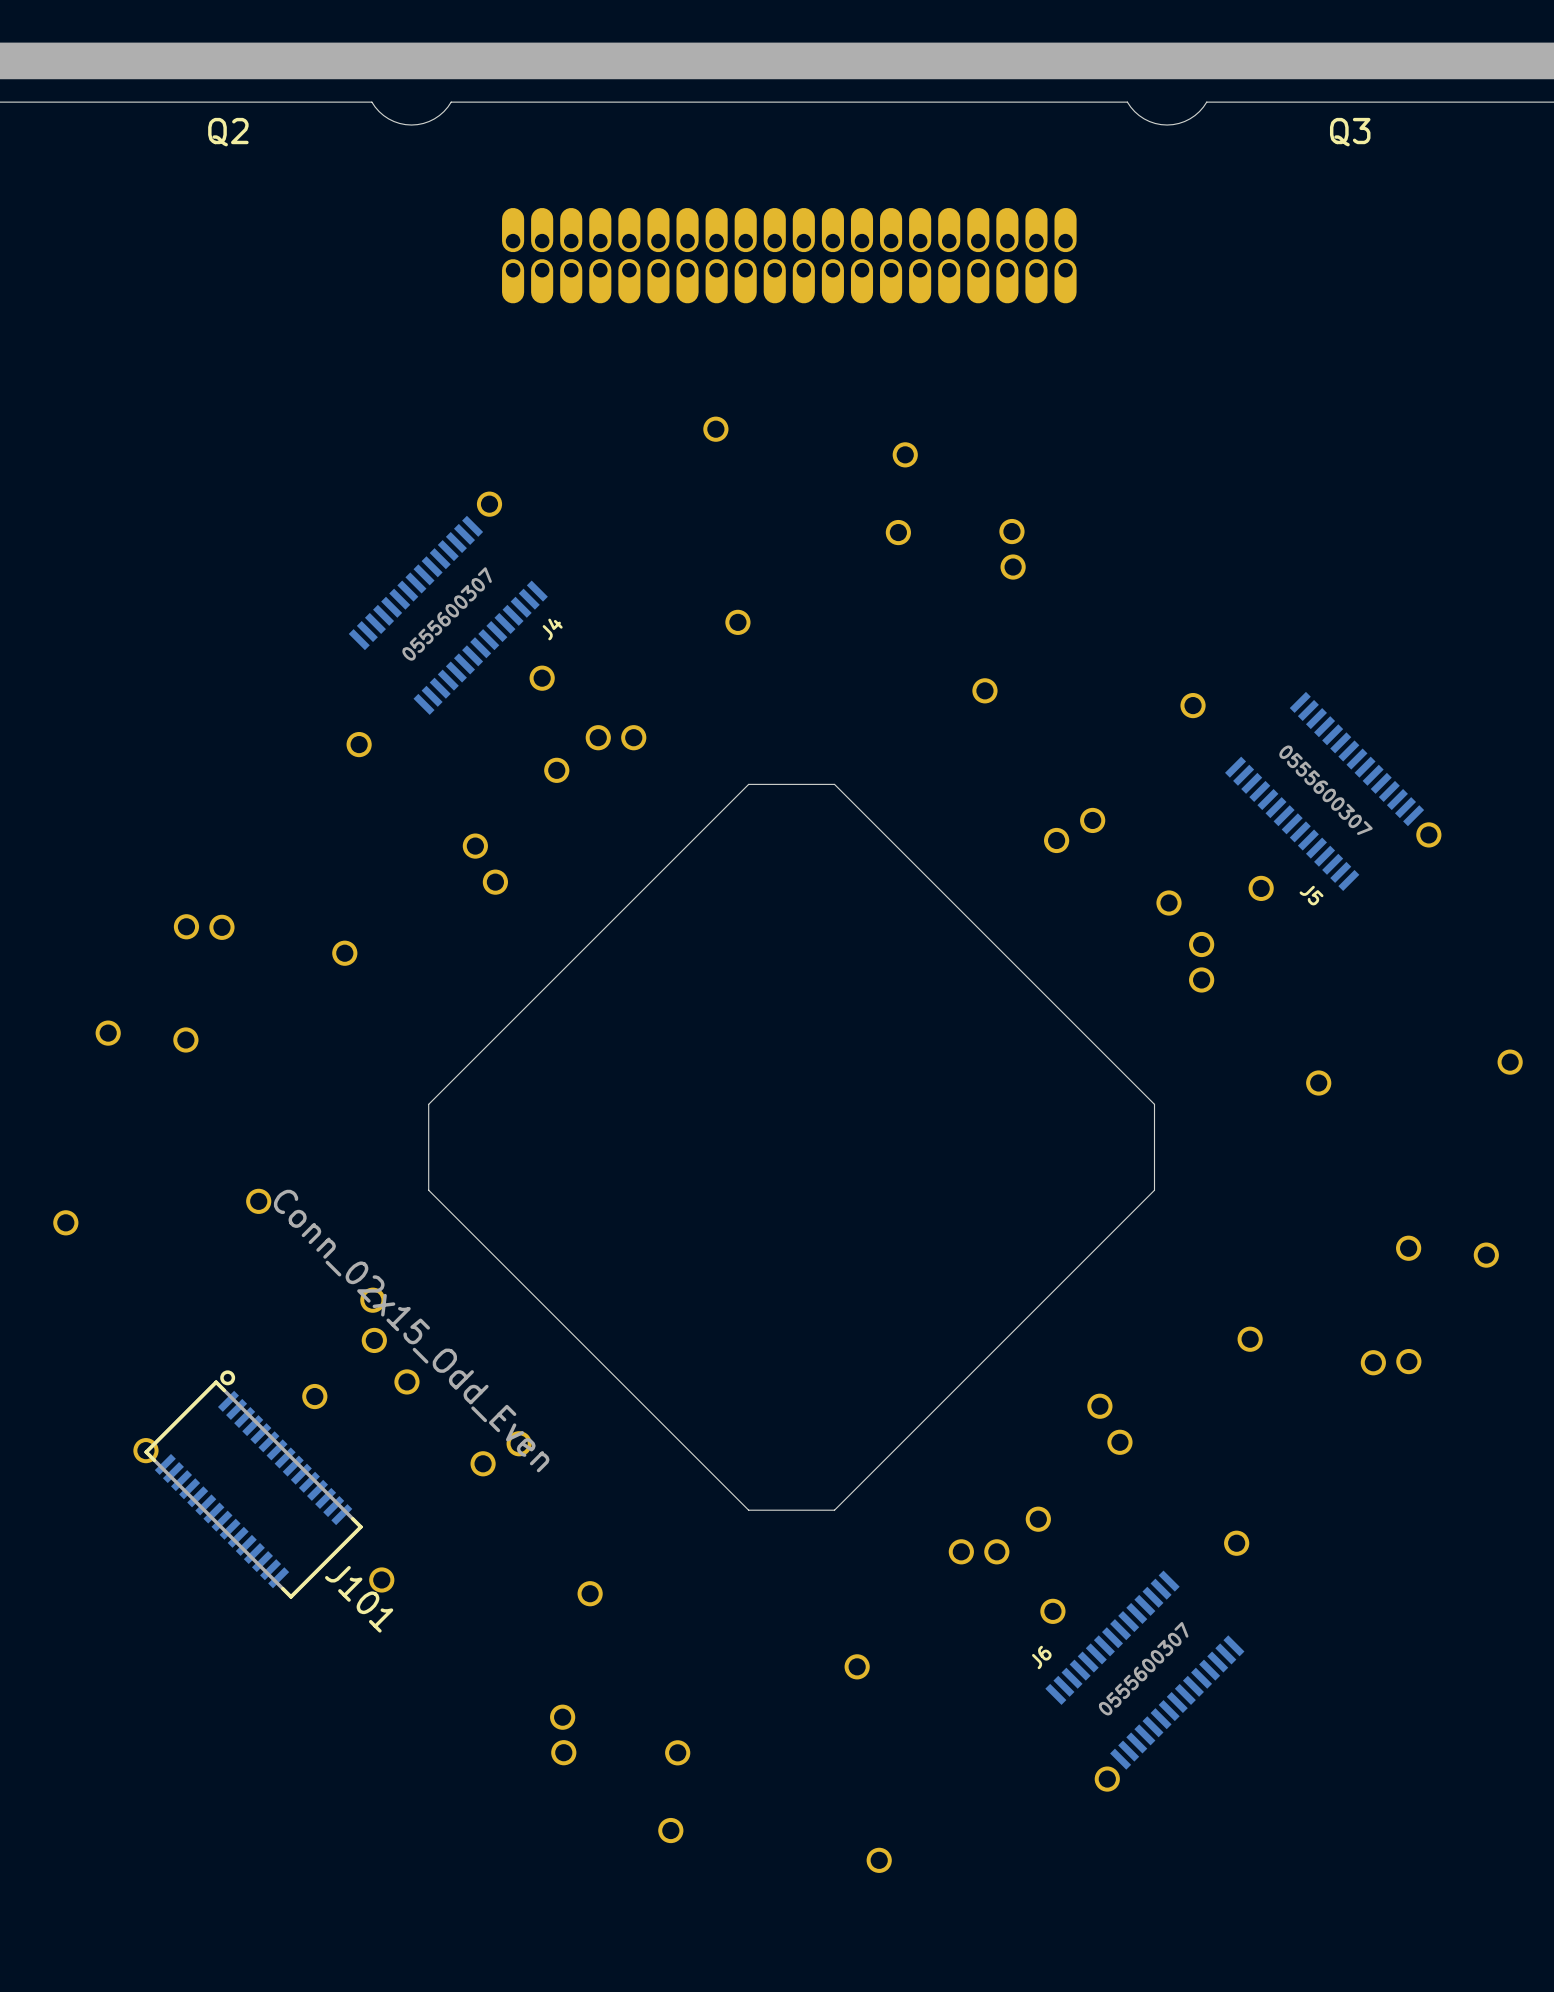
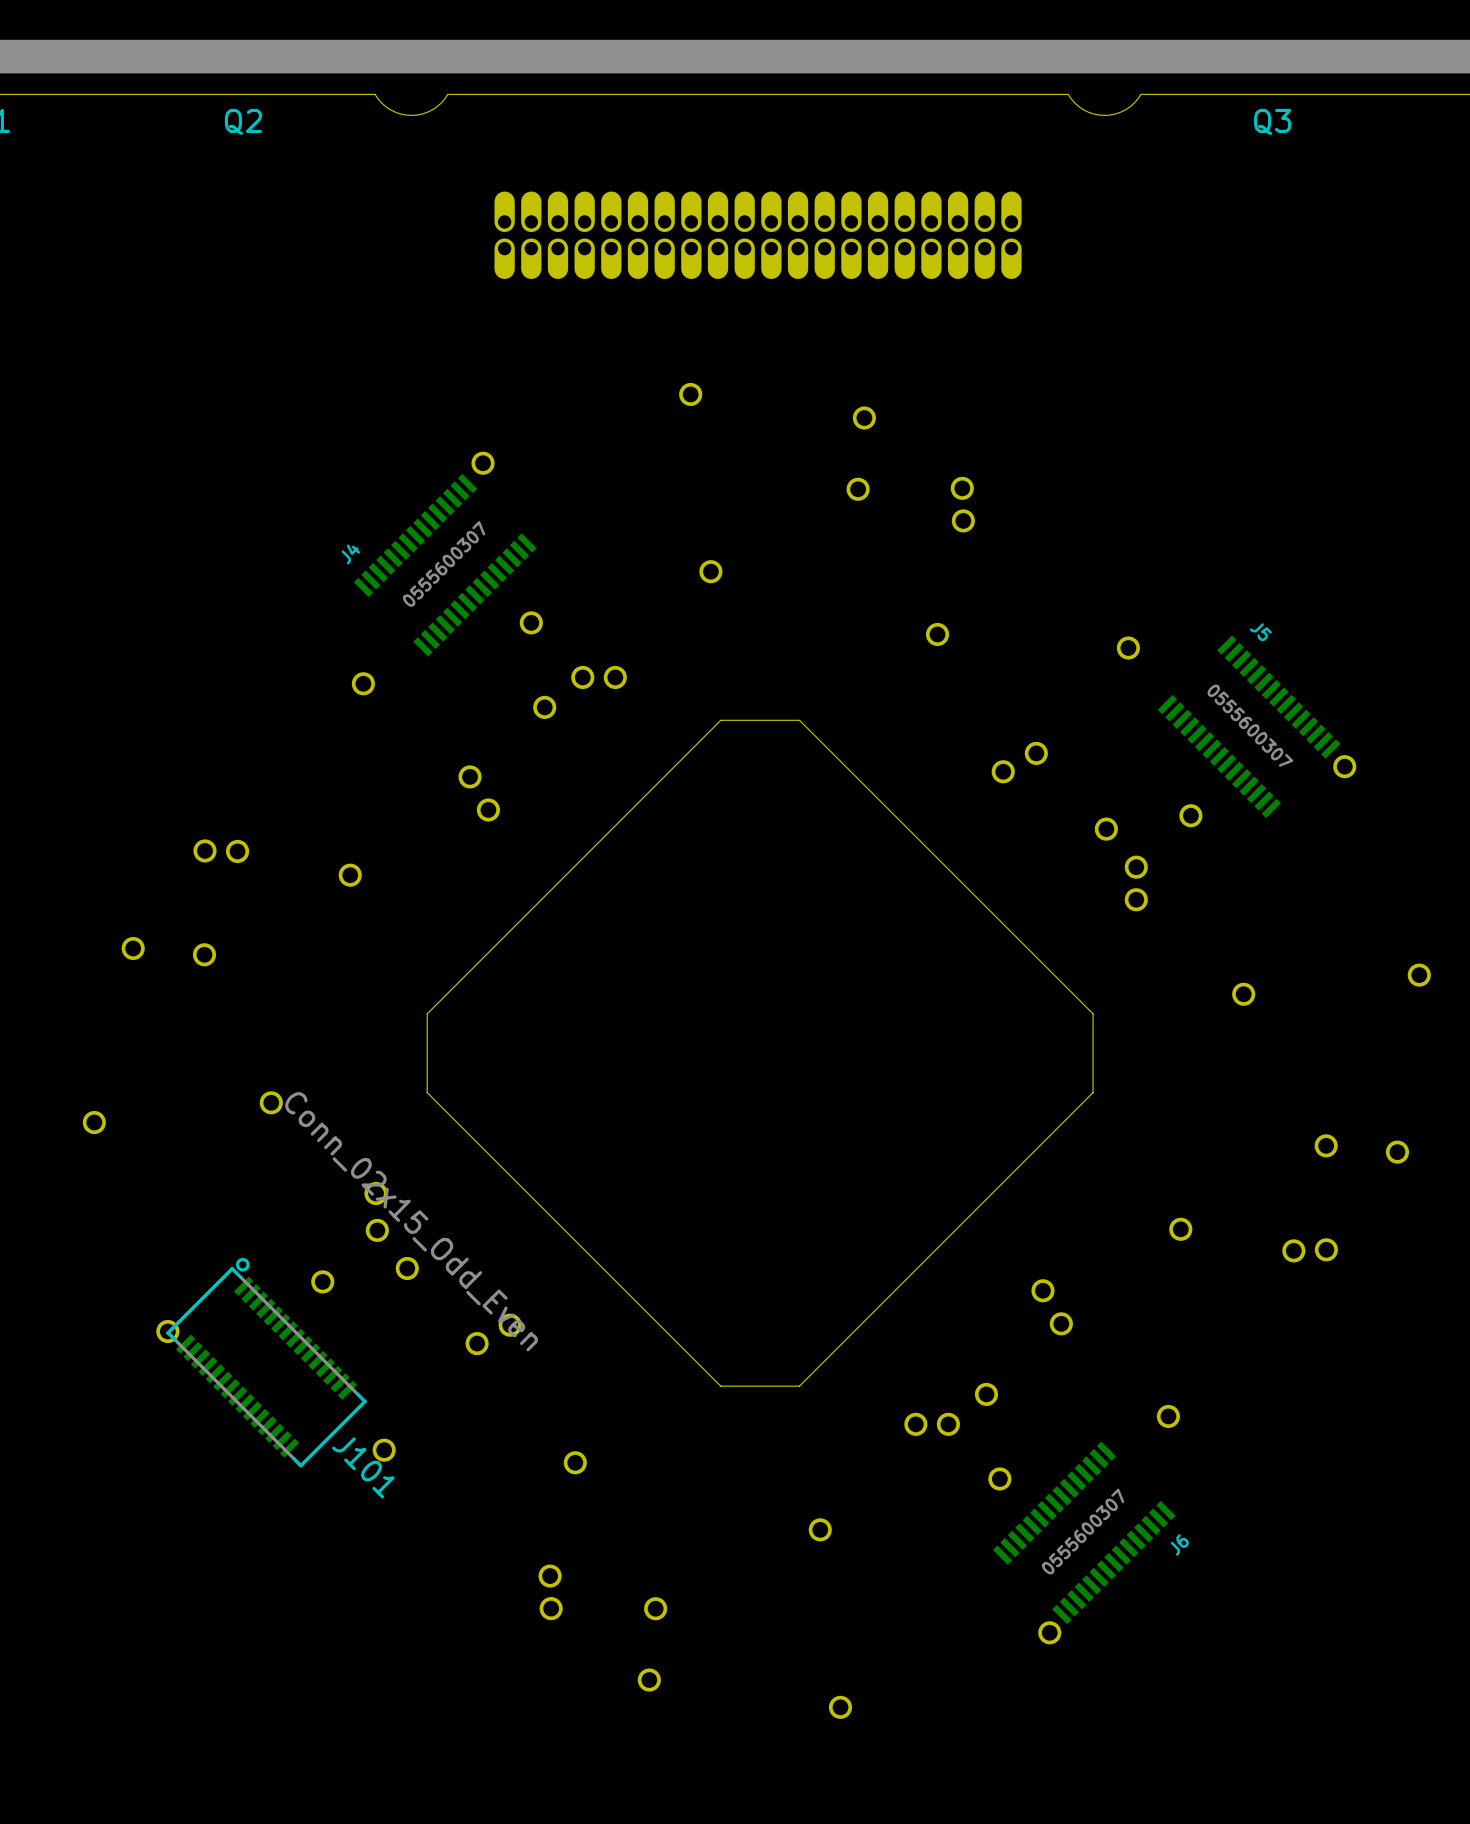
J4 name position: J4 (552, 629) -> J4 (350, 554)
J5 name position: J5 (1311, 895) -> J5 (1260, 632)
J6 name position: J6 (1041, 1657) -> J6 (1179, 1545)

